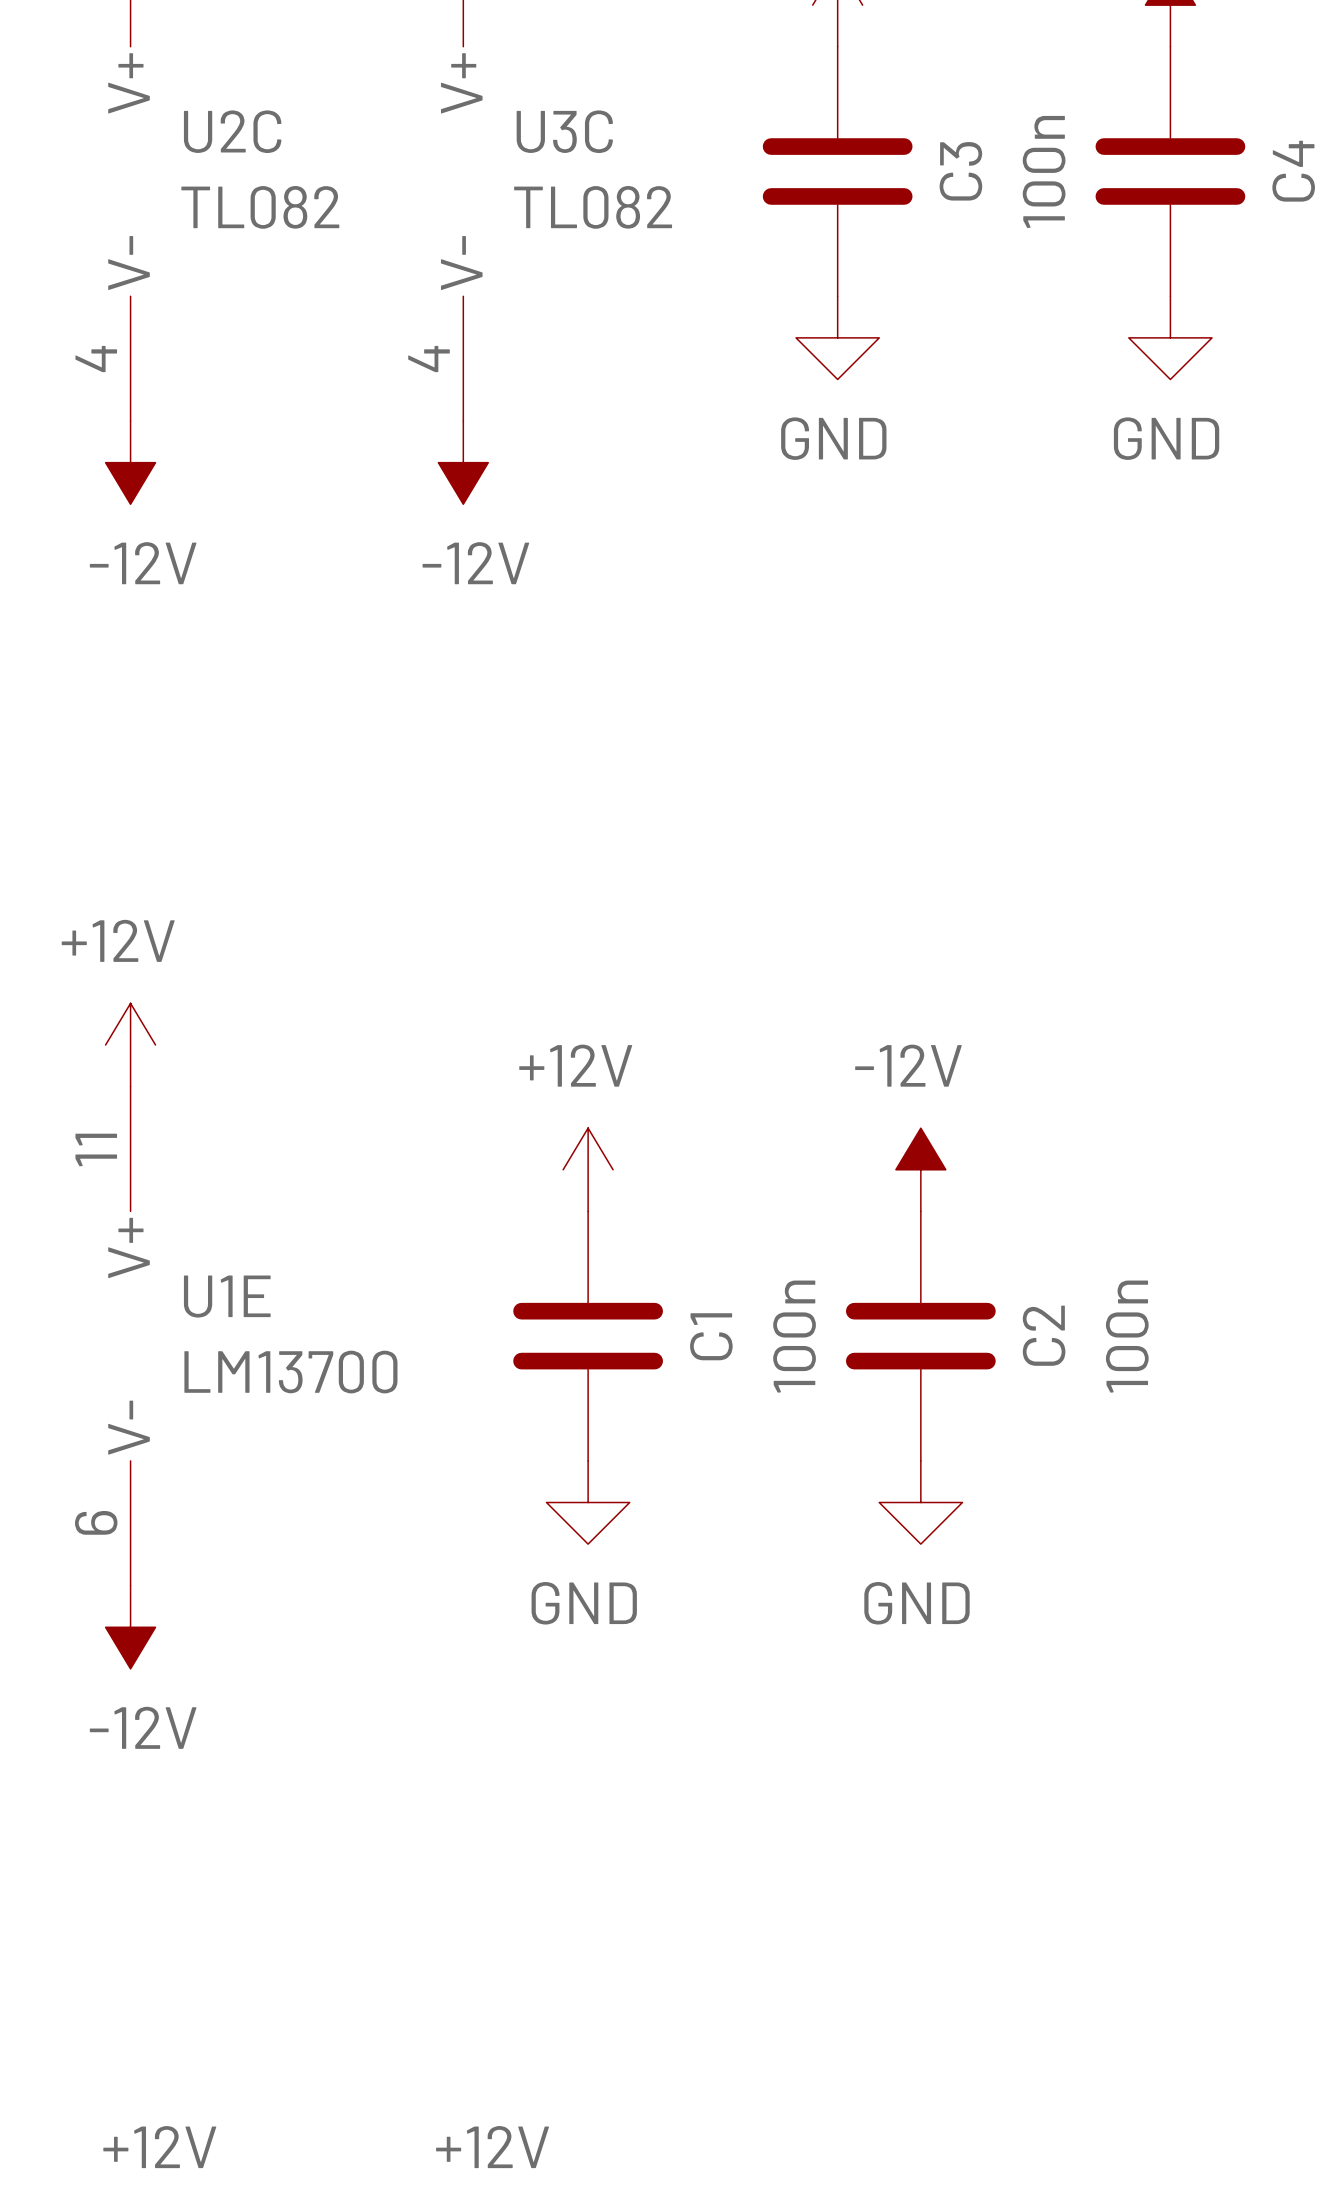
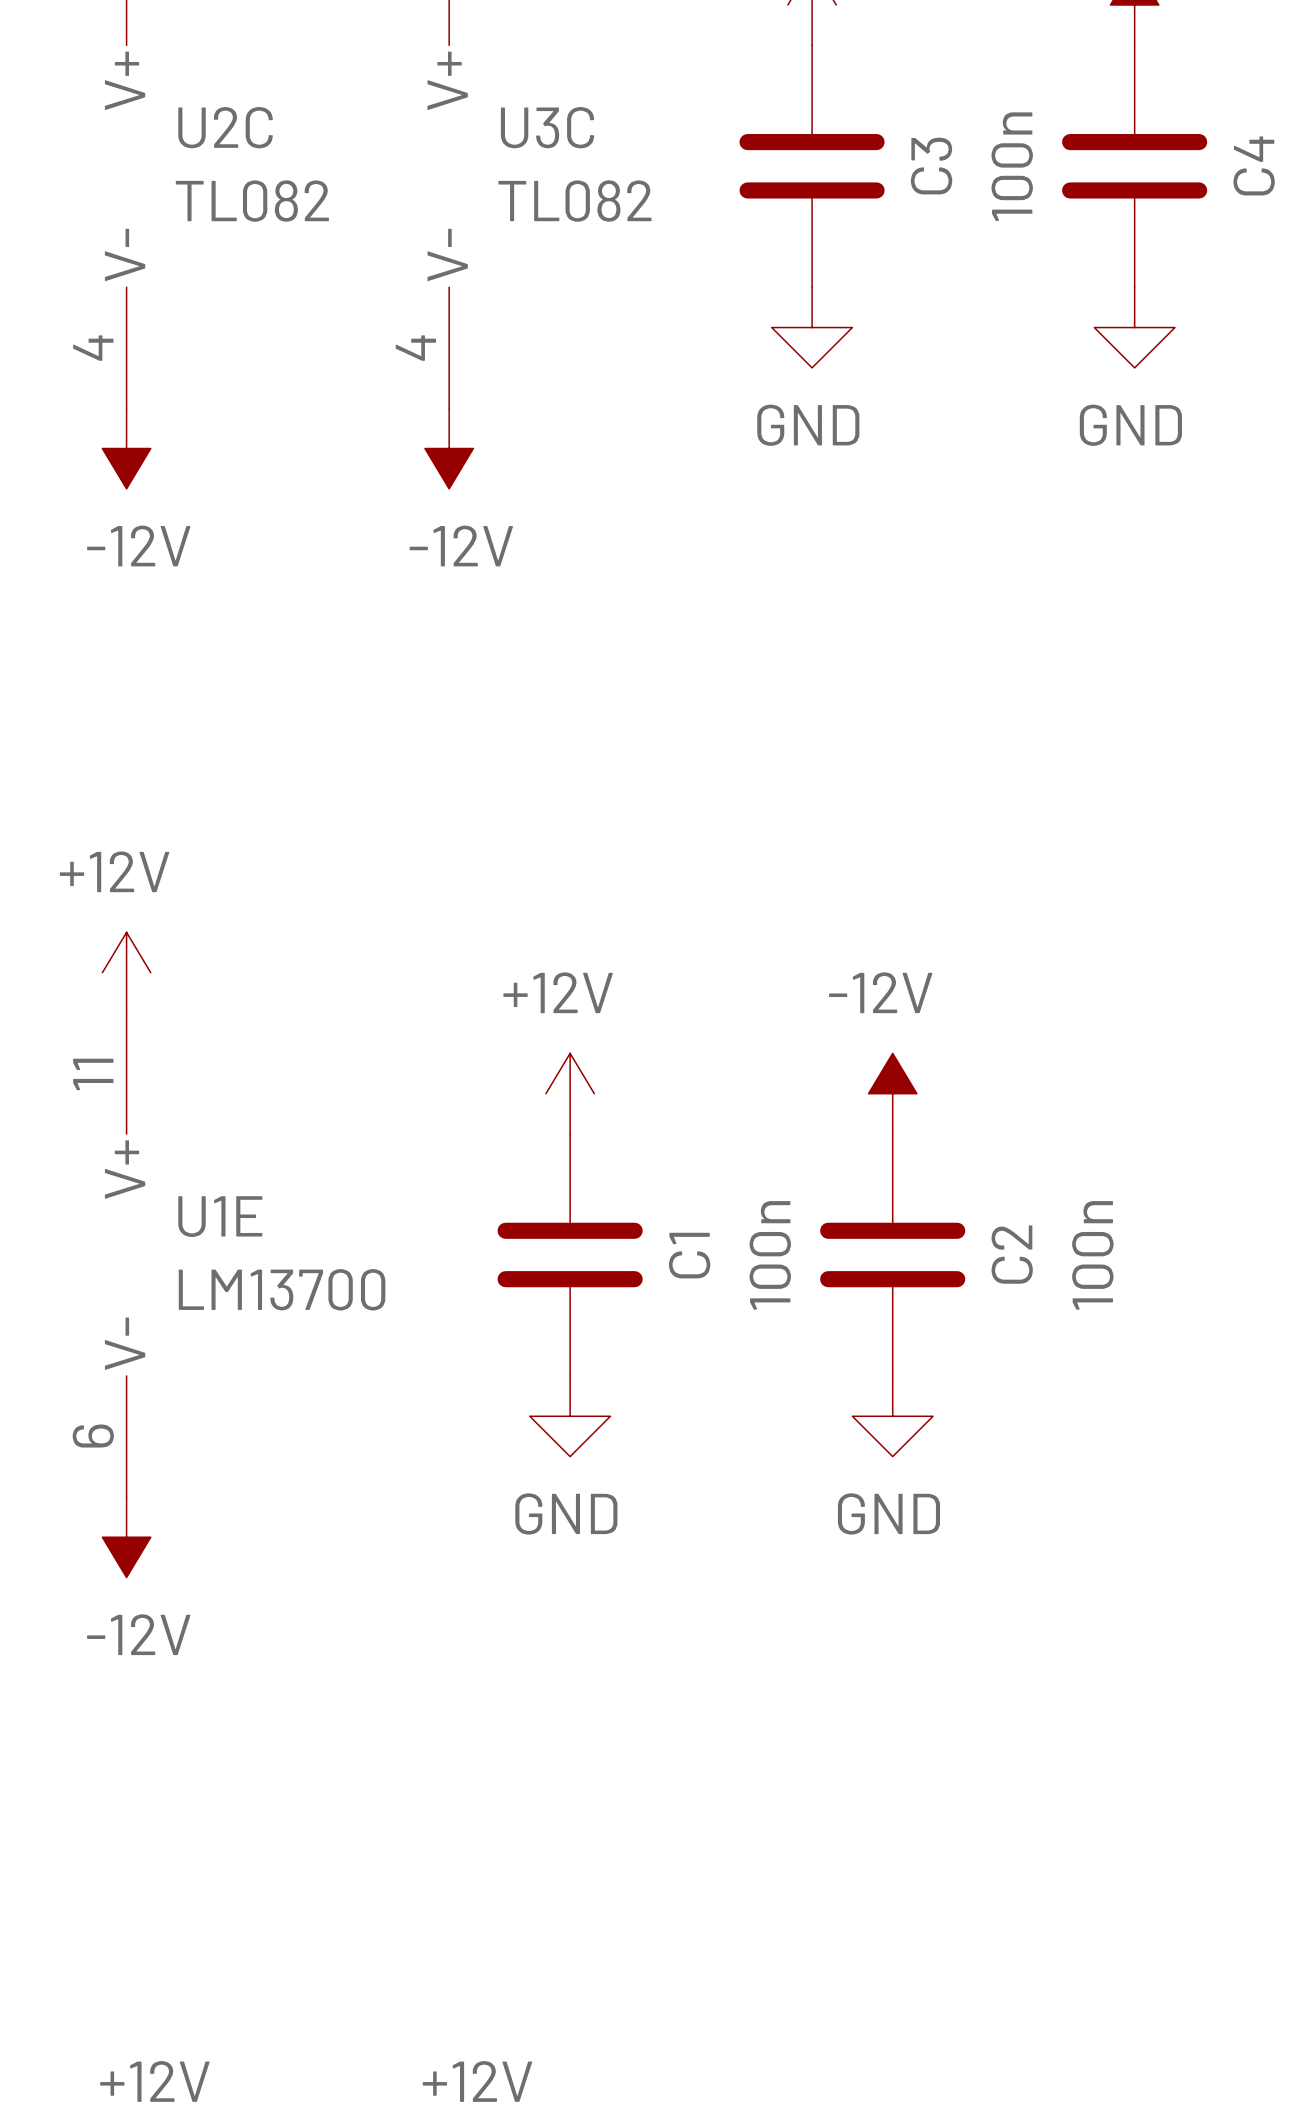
power symbol position: +12V (130, 1044) -> +12V (126, 972)
power symbol position: +12V (588, 1169) -> +12V (570, 1093)
power symbol position: -12V (920, 1169) -> -12V (892, 1093)
U1E position: (130, 1336) -> (126, 1254)
C1 position: (588, 1336) -> (570, 1254)
C2 position: (920, 1336) -> (892, 1254)
power symbol position: GND (588, 1502) -> GND (570, 1416)
power symbol position: GND (920, 1502) -> GND (892, 1416)
power symbol position: -12V (130, 1627) -> -12V (126, 1537)

